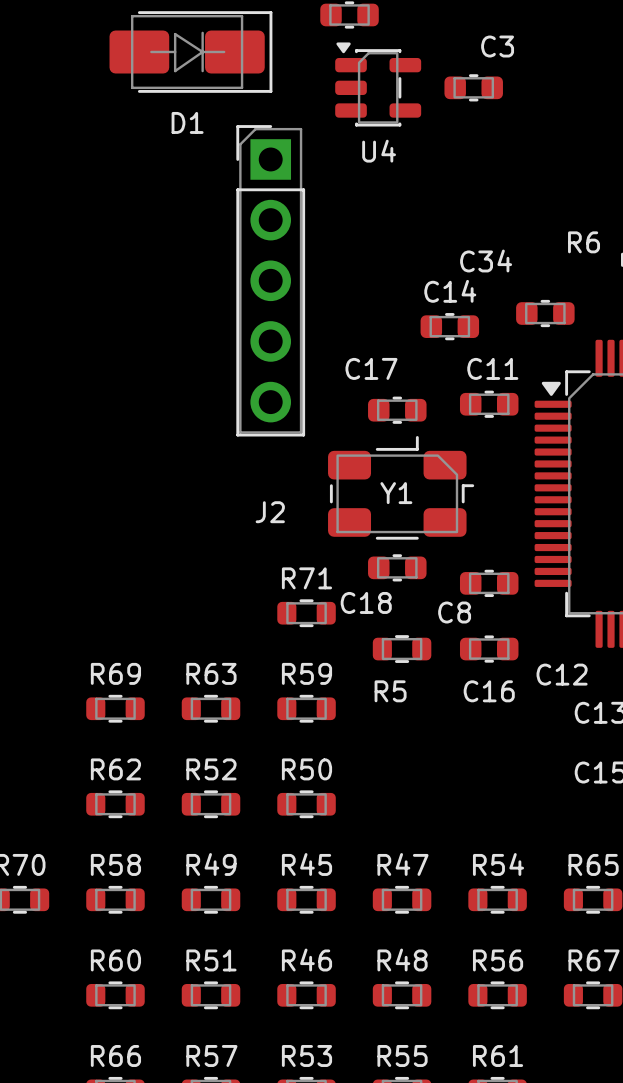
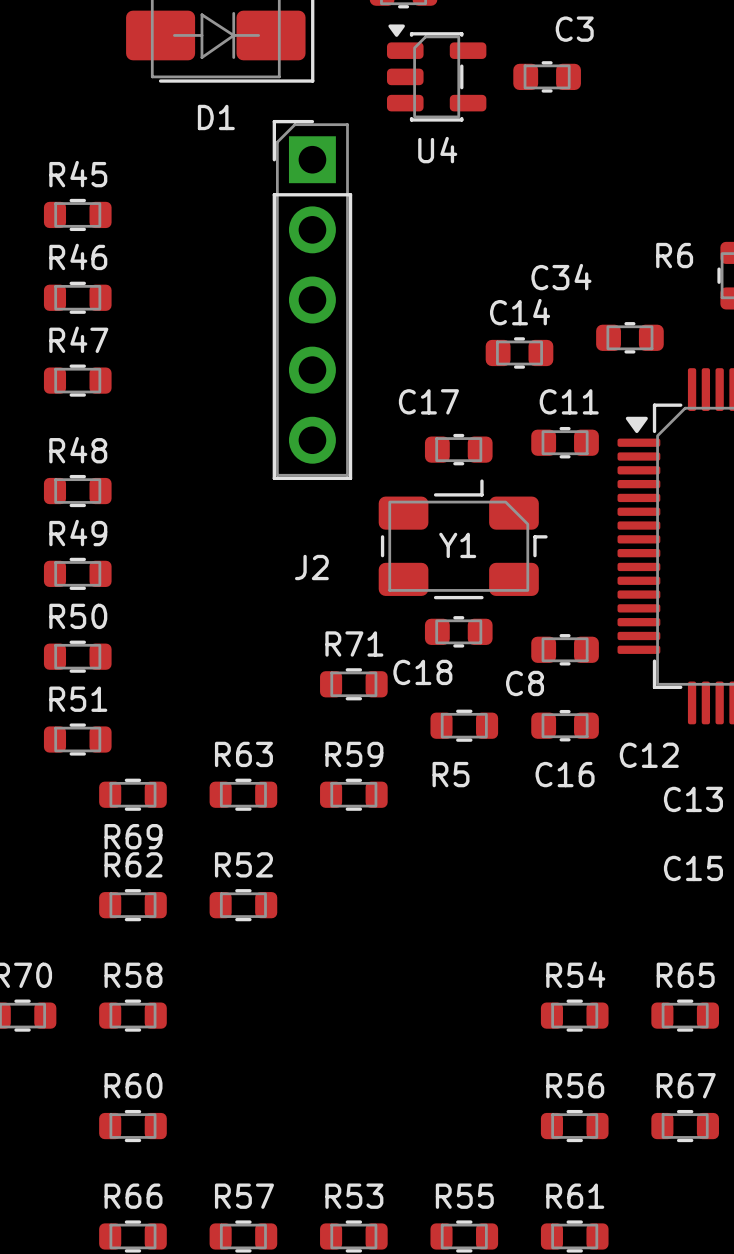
R69 name position: R69 (115, 673) -> R69 (133, 836)
R50 position: (306, 804) -> (77, 656)
R49 position: (211, 899) -> (77, 573)
R45 position: (306, 899) -> (77, 214)
R47 position: (402, 899) -> (77, 380)
R51 position: (211, 995) -> (77, 739)
R46 position: (306, 995) -> (77, 297)
R48 position: (402, 995) -> (77, 491)

